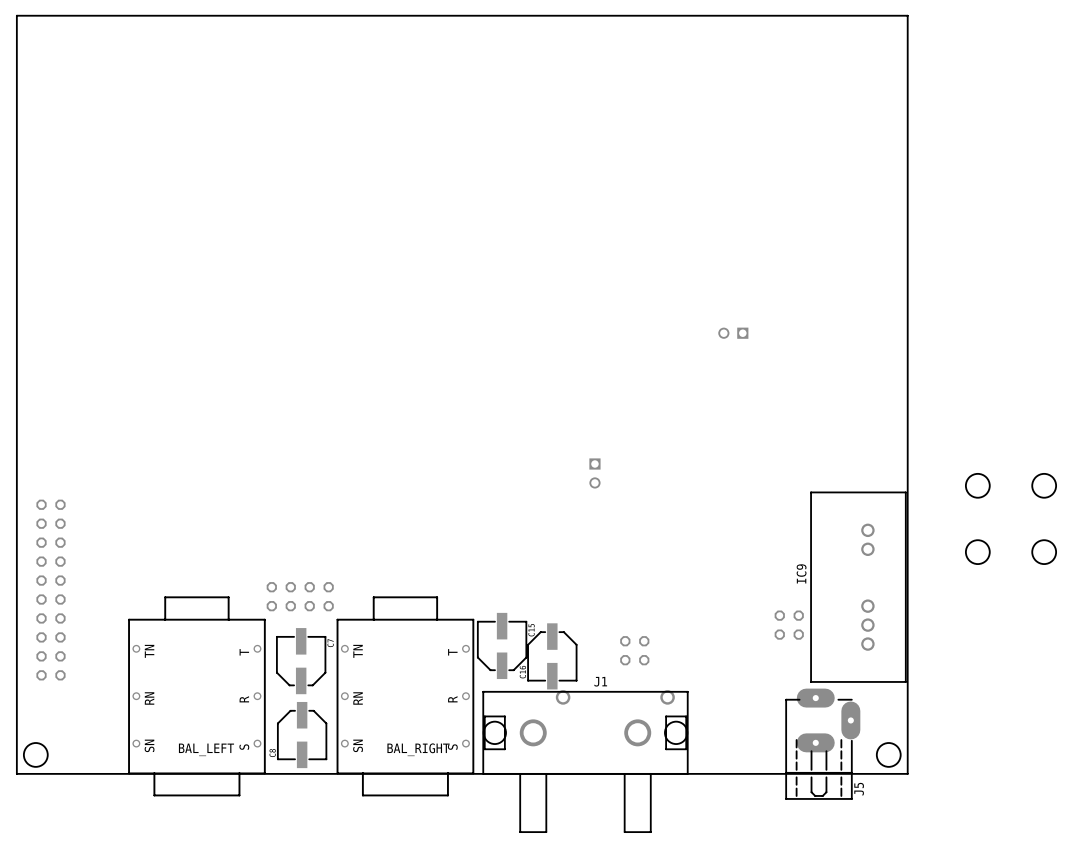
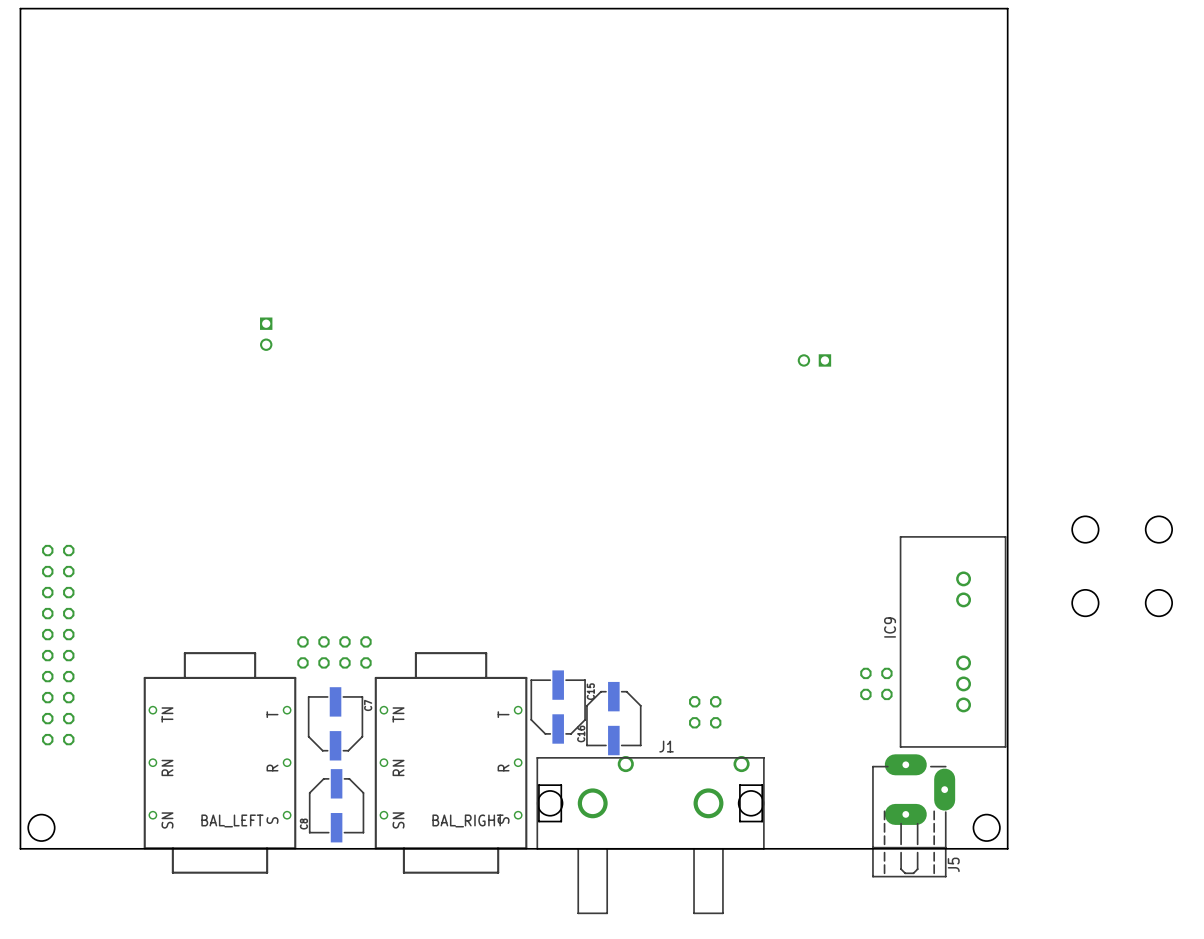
part: none -> (266, 334)
part: (594, 473) -> none

